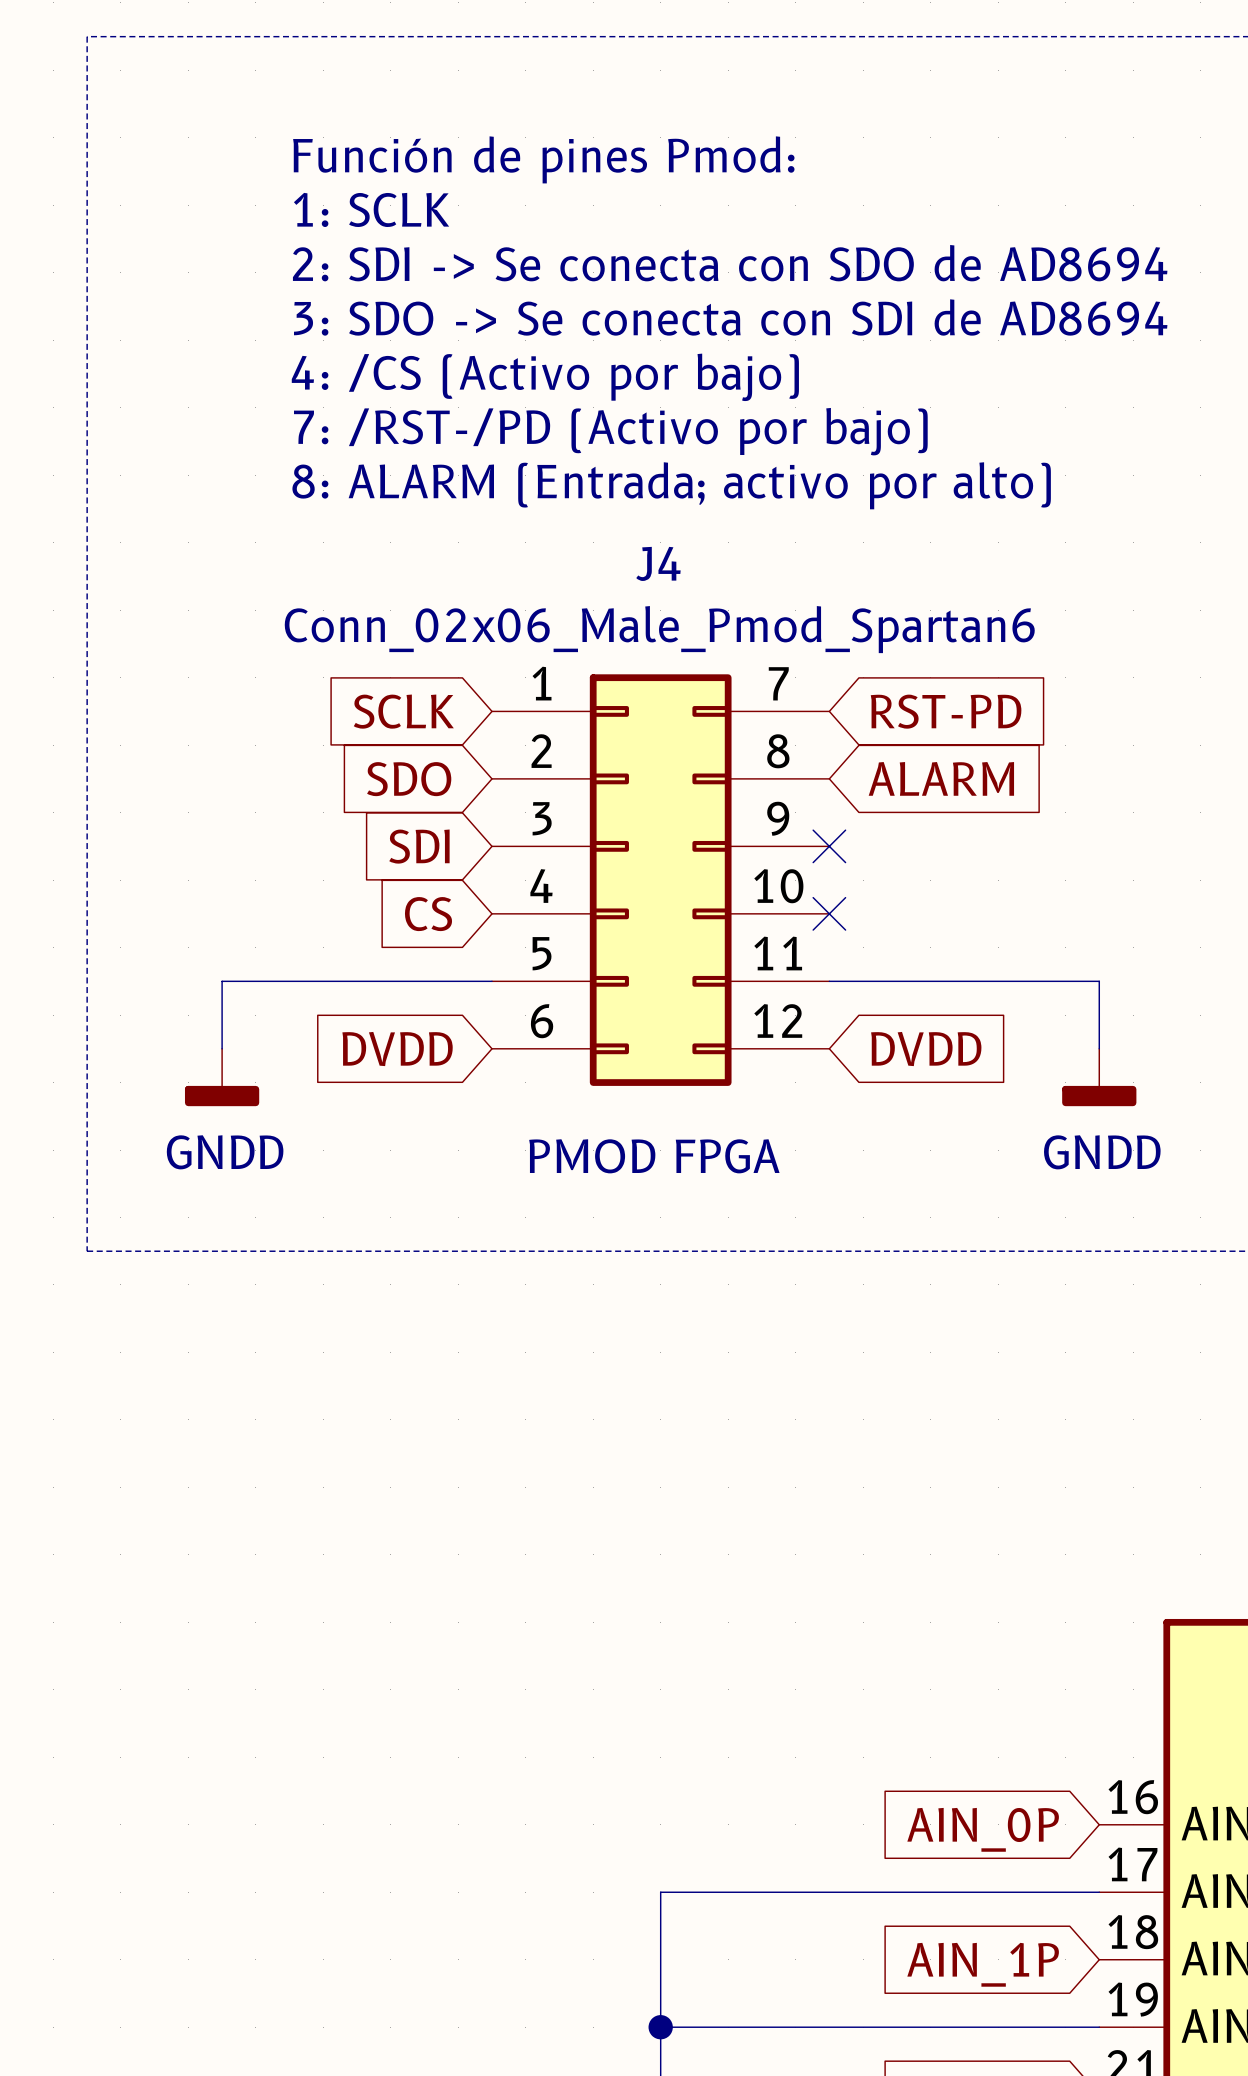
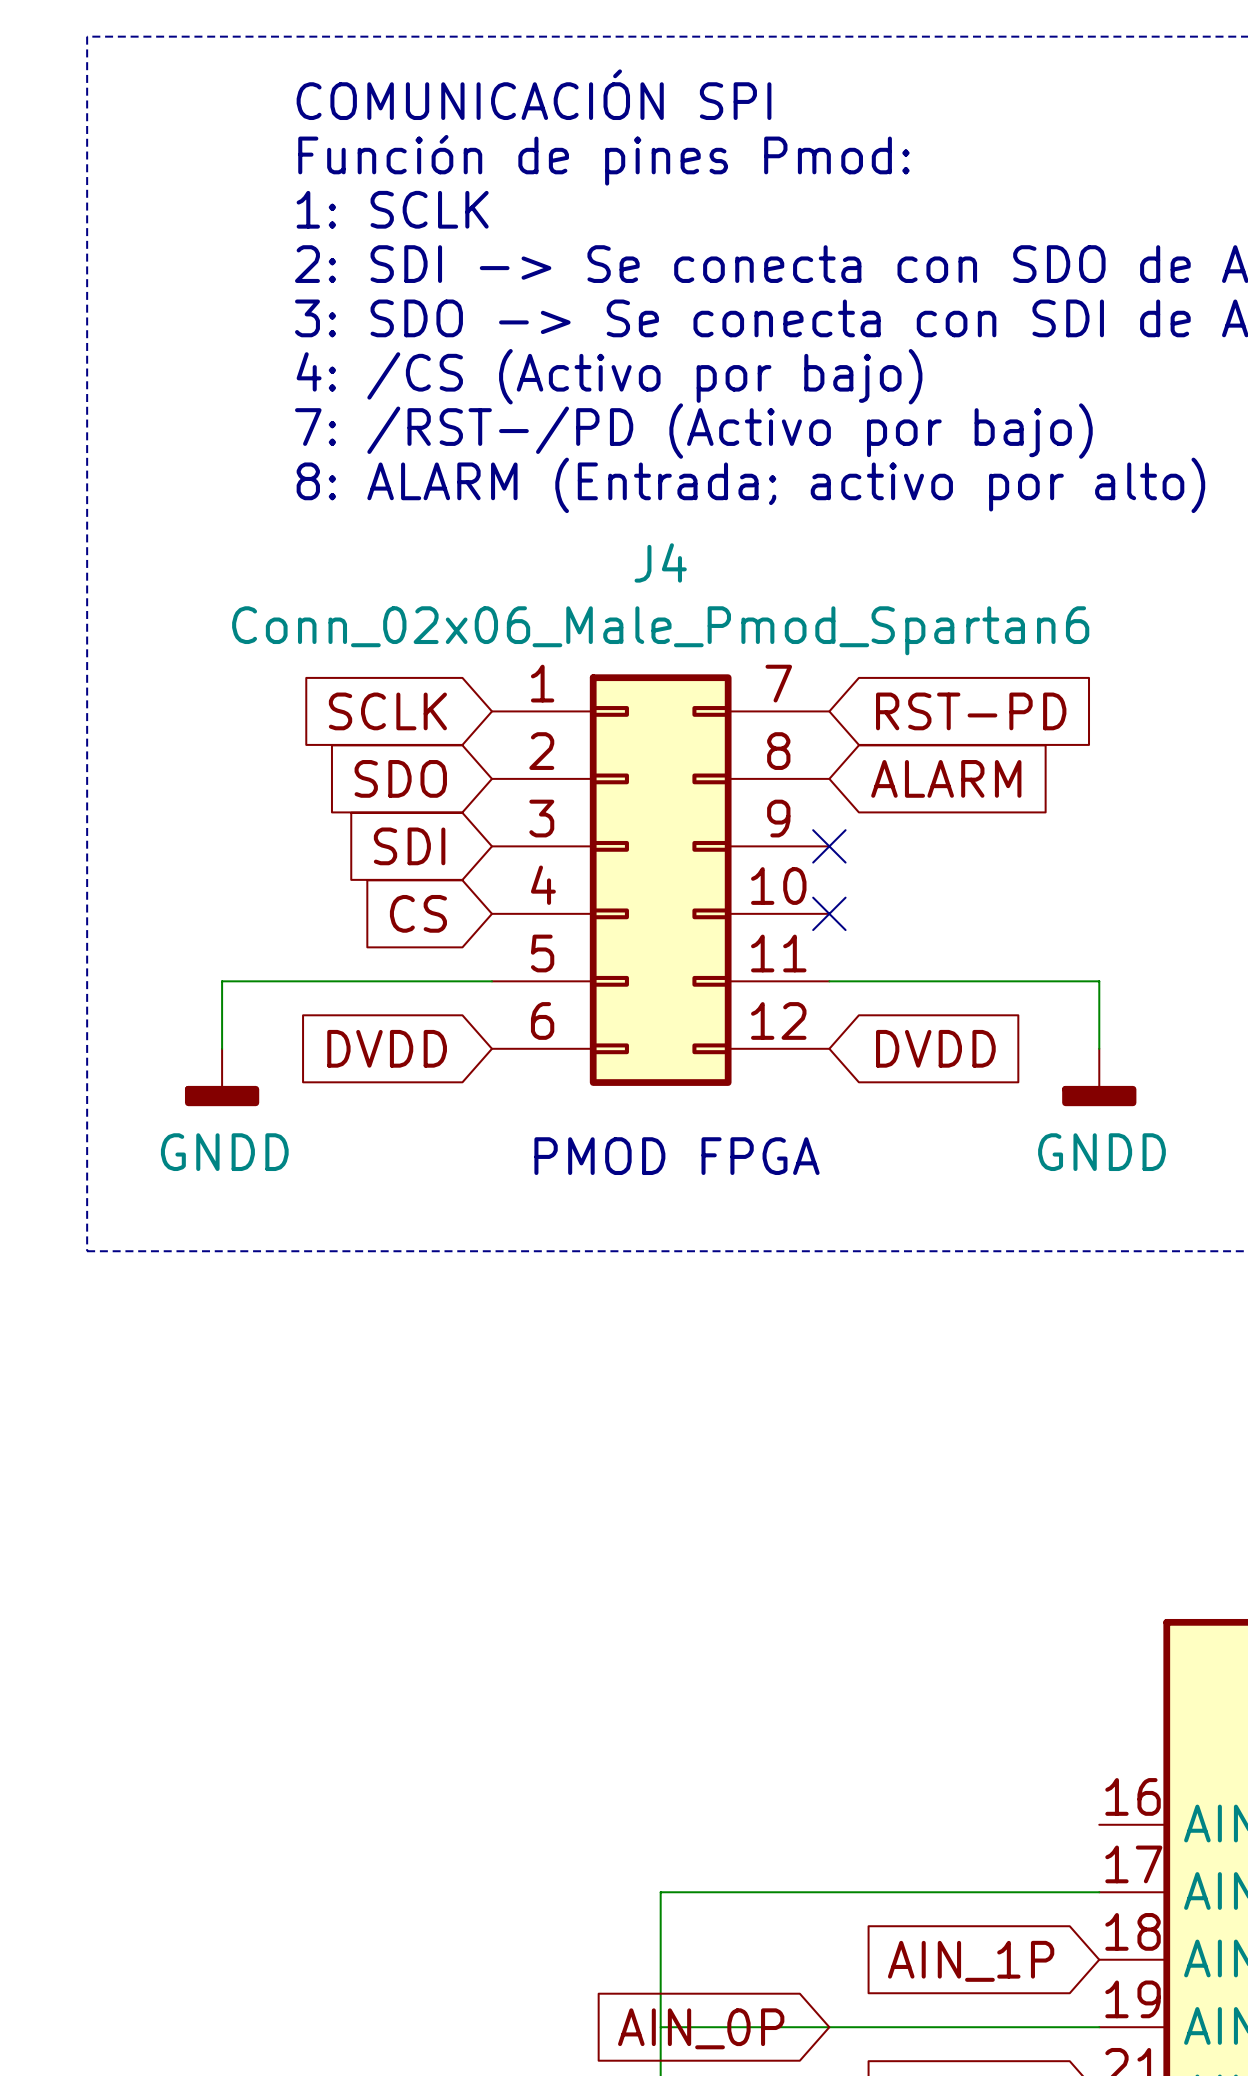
text: none -> COMUNICACIÓN SPI (534, 94)
global label position: AIN_0P (983, 1829) -> AIN_0P (701, 2028)
junction: (660, 2027) -> none

